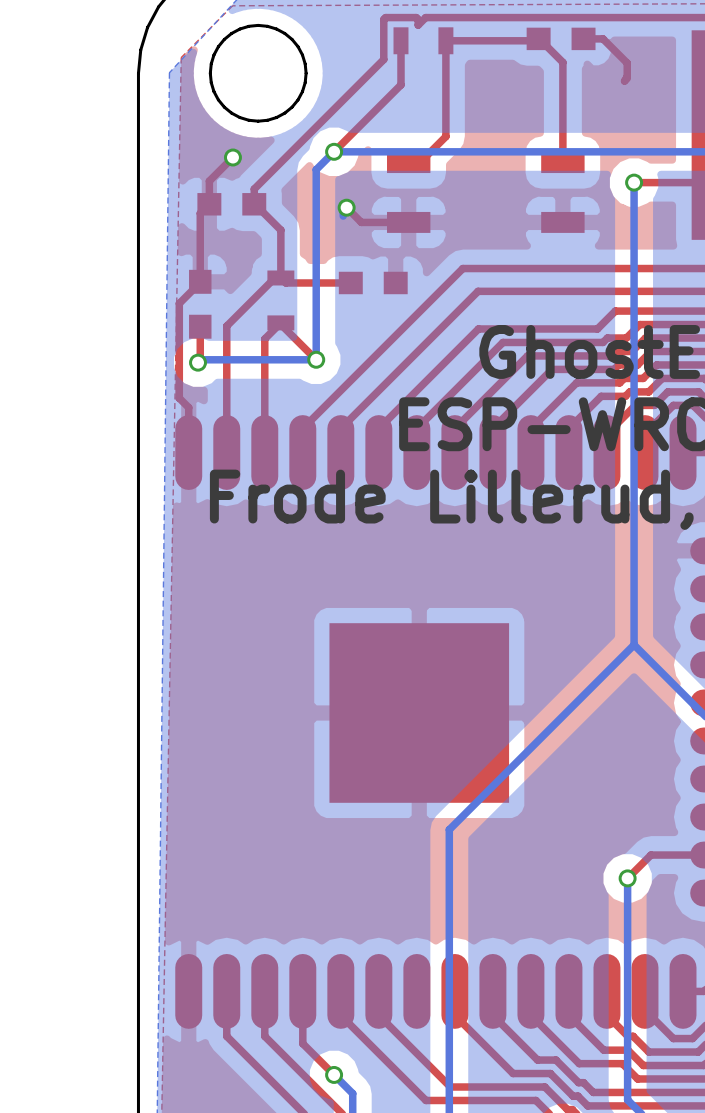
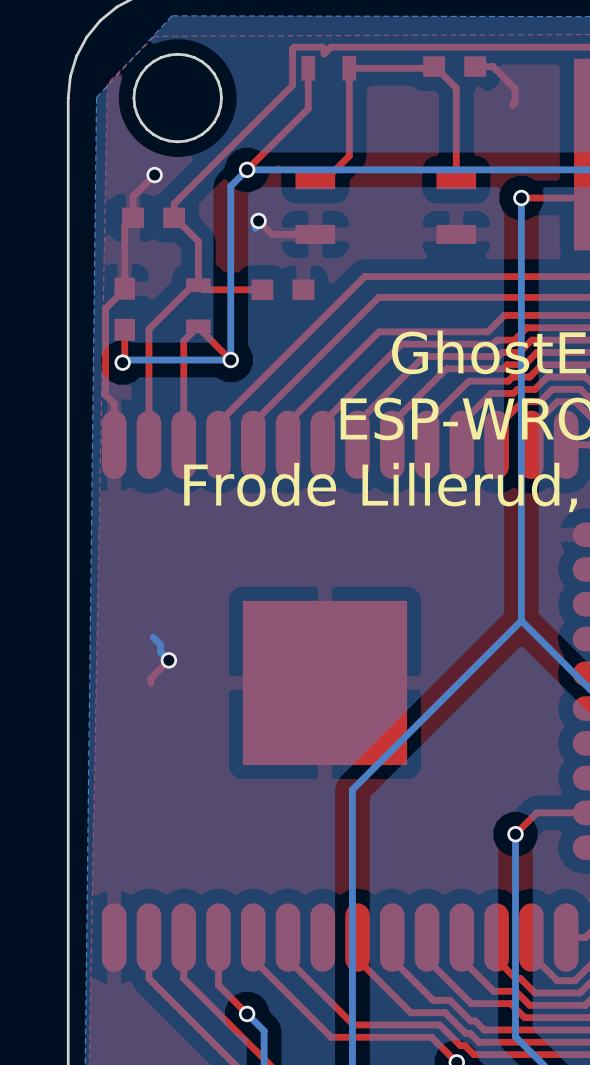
bottom track: none -> (153, 637) (160, 644) (160, 652) (168, 660)
top track: none -> (168, 660) (150, 678) (150, 683)
via: none -> (168, 660)

